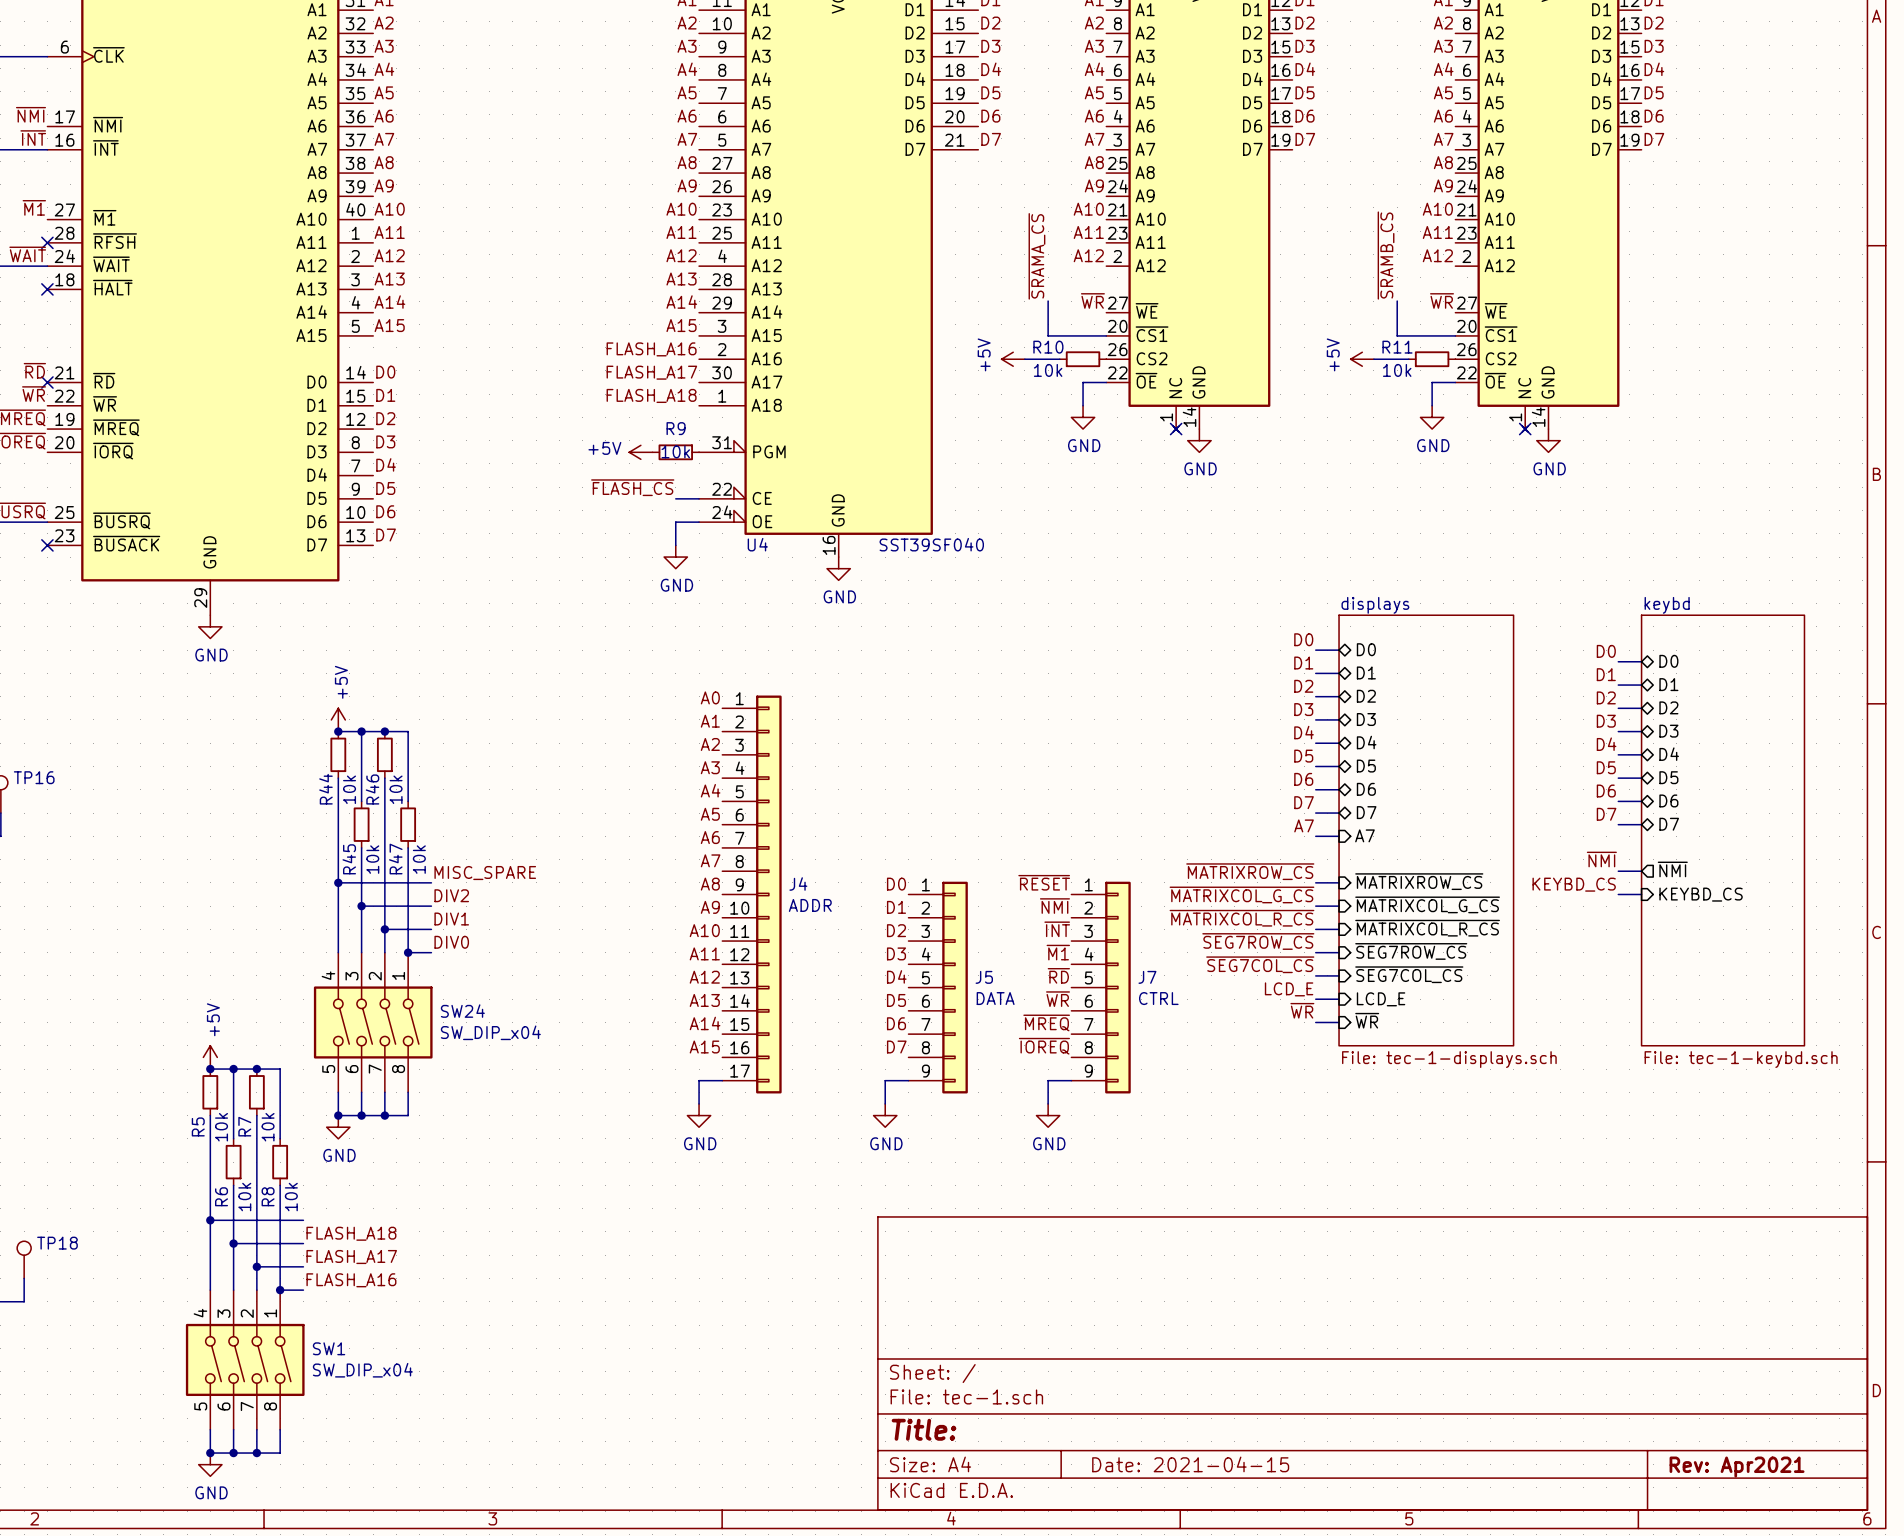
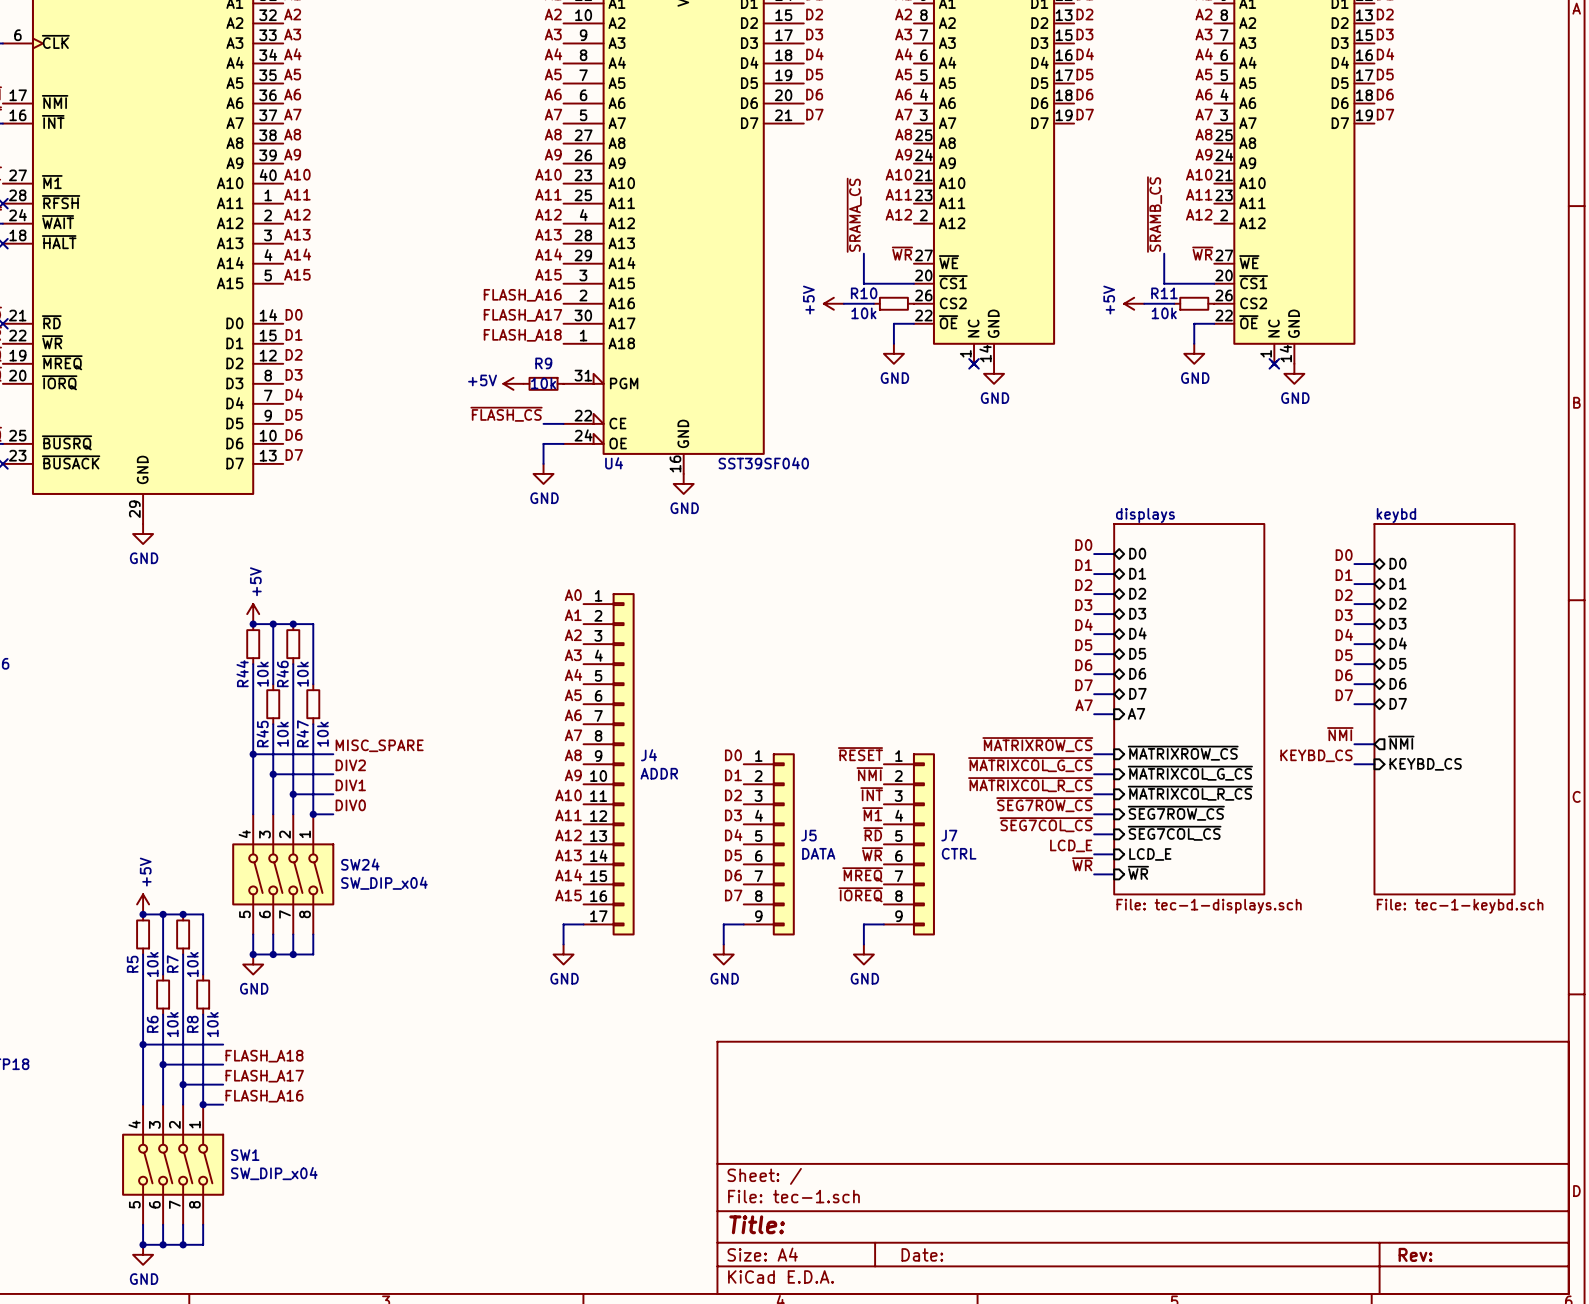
title block: Date: 2021-04-15 (1190, 1464) -> Date: (922, 1254)
title block: Rev: Apr2021 (1737, 1467) -> Rev: (1415, 1254)

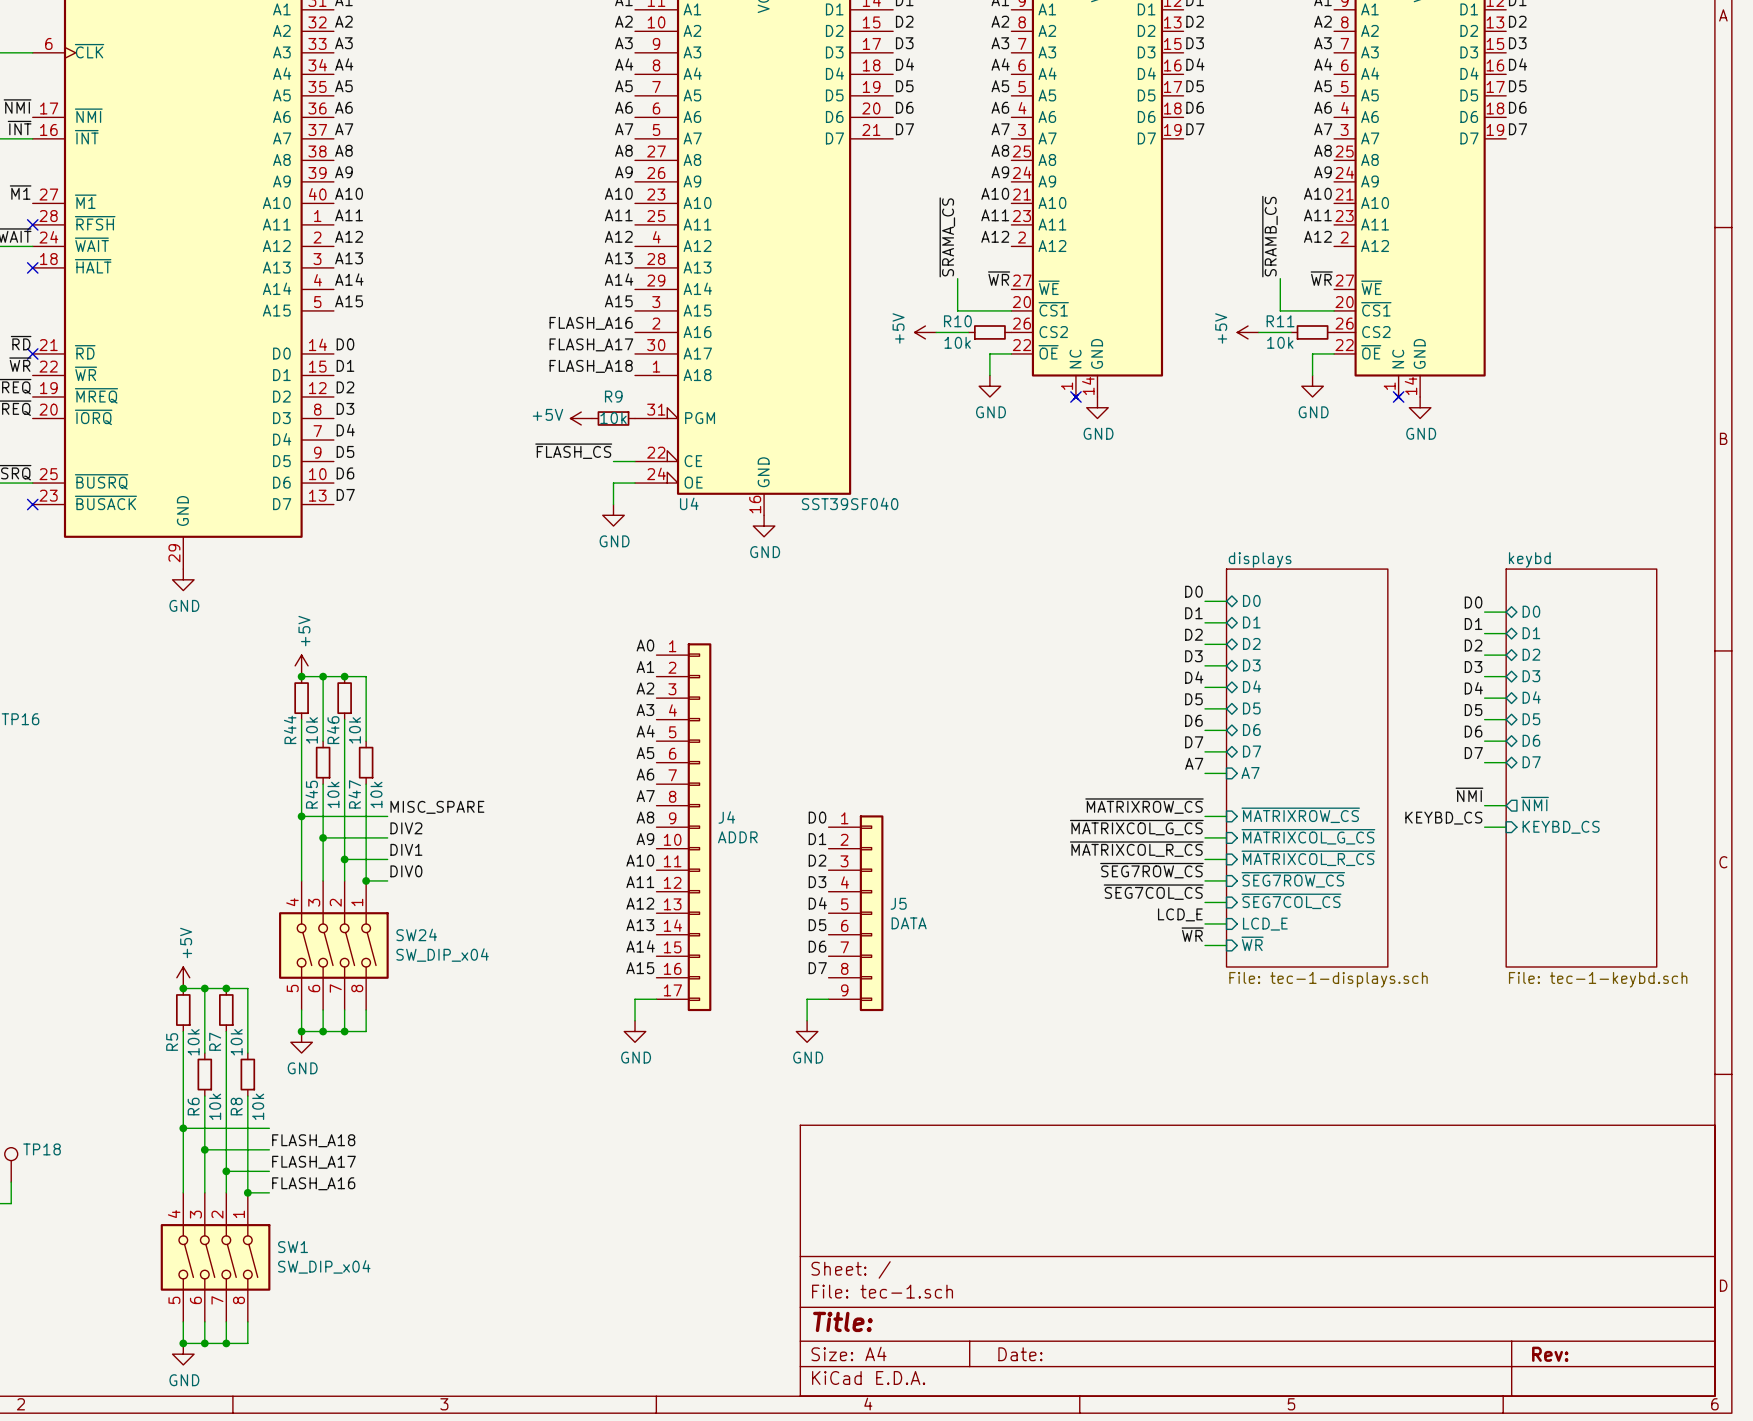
label: ~{RESET} (860, 754) -> none
label: ~{NMI} (869, 774) -> none
label: ~{INT} (871, 794) -> none
label: ~{M1} (872, 814) -> none
label: ~{RD} (873, 834) -> none
J7: CTRL (909, 844) -> none
label: ~{WR} (872, 854) -> none
label: ~{MREQ} (862, 874) -> none
label: ~{IOREQ} (860, 894) -> none
wire: (883, 924) (863, 924) (863, 944) -> none
power symbol: GND (863, 954) -> none

